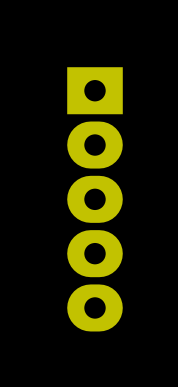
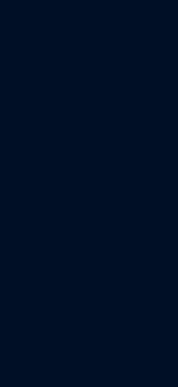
part: (95, 199) -> none

